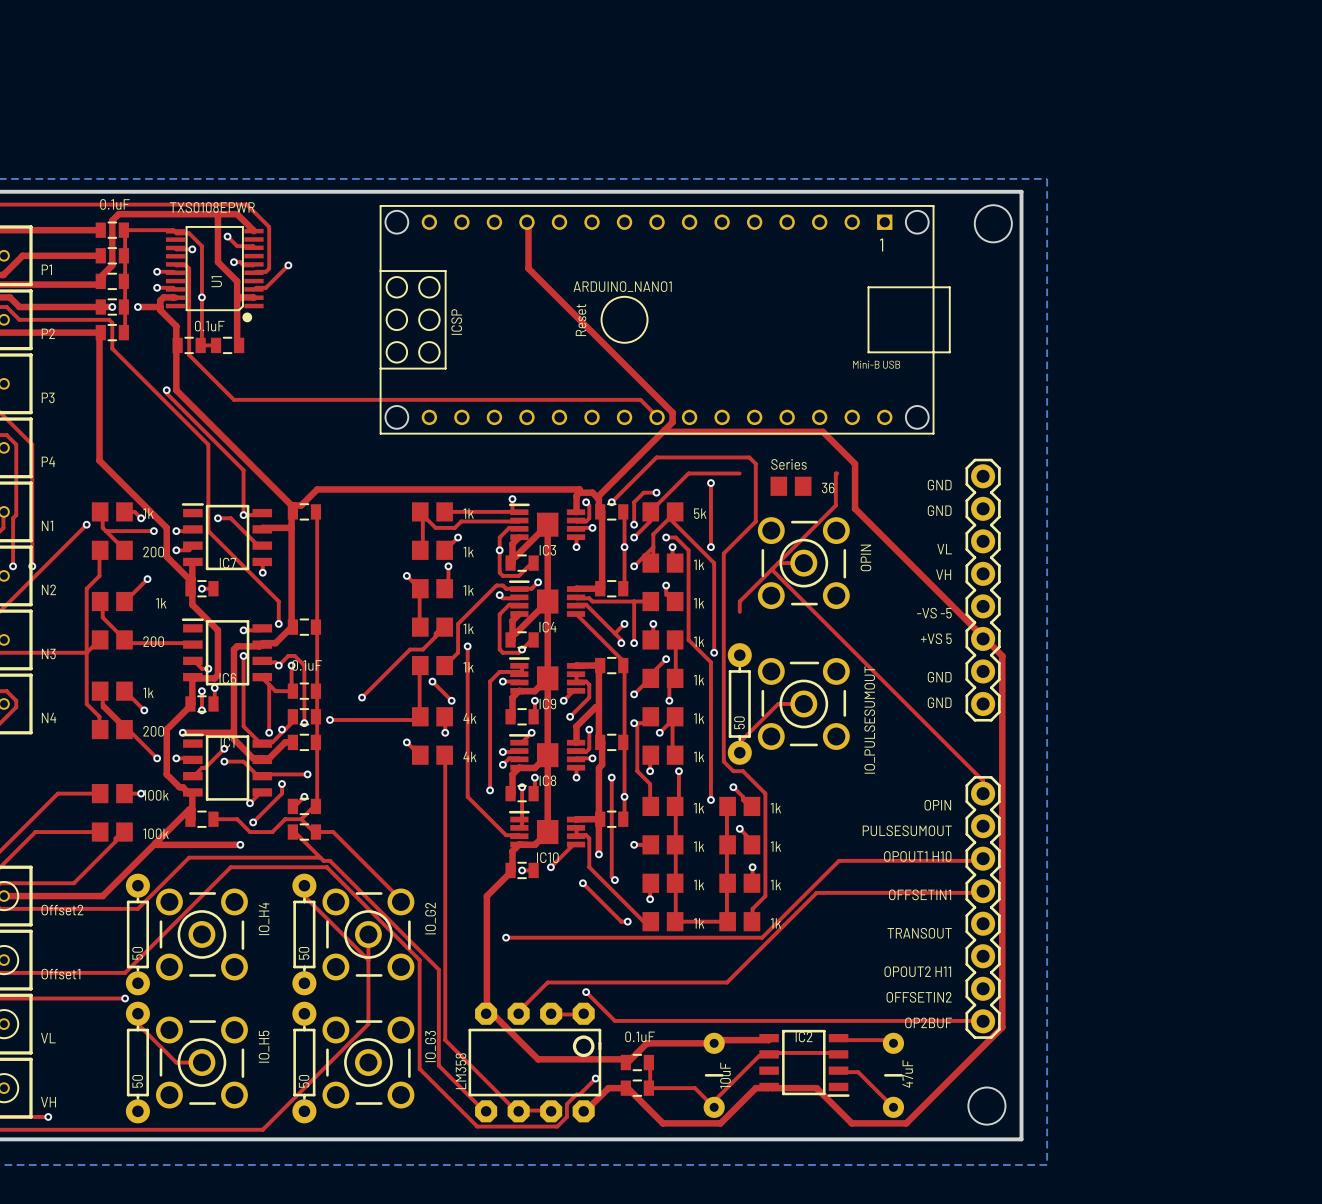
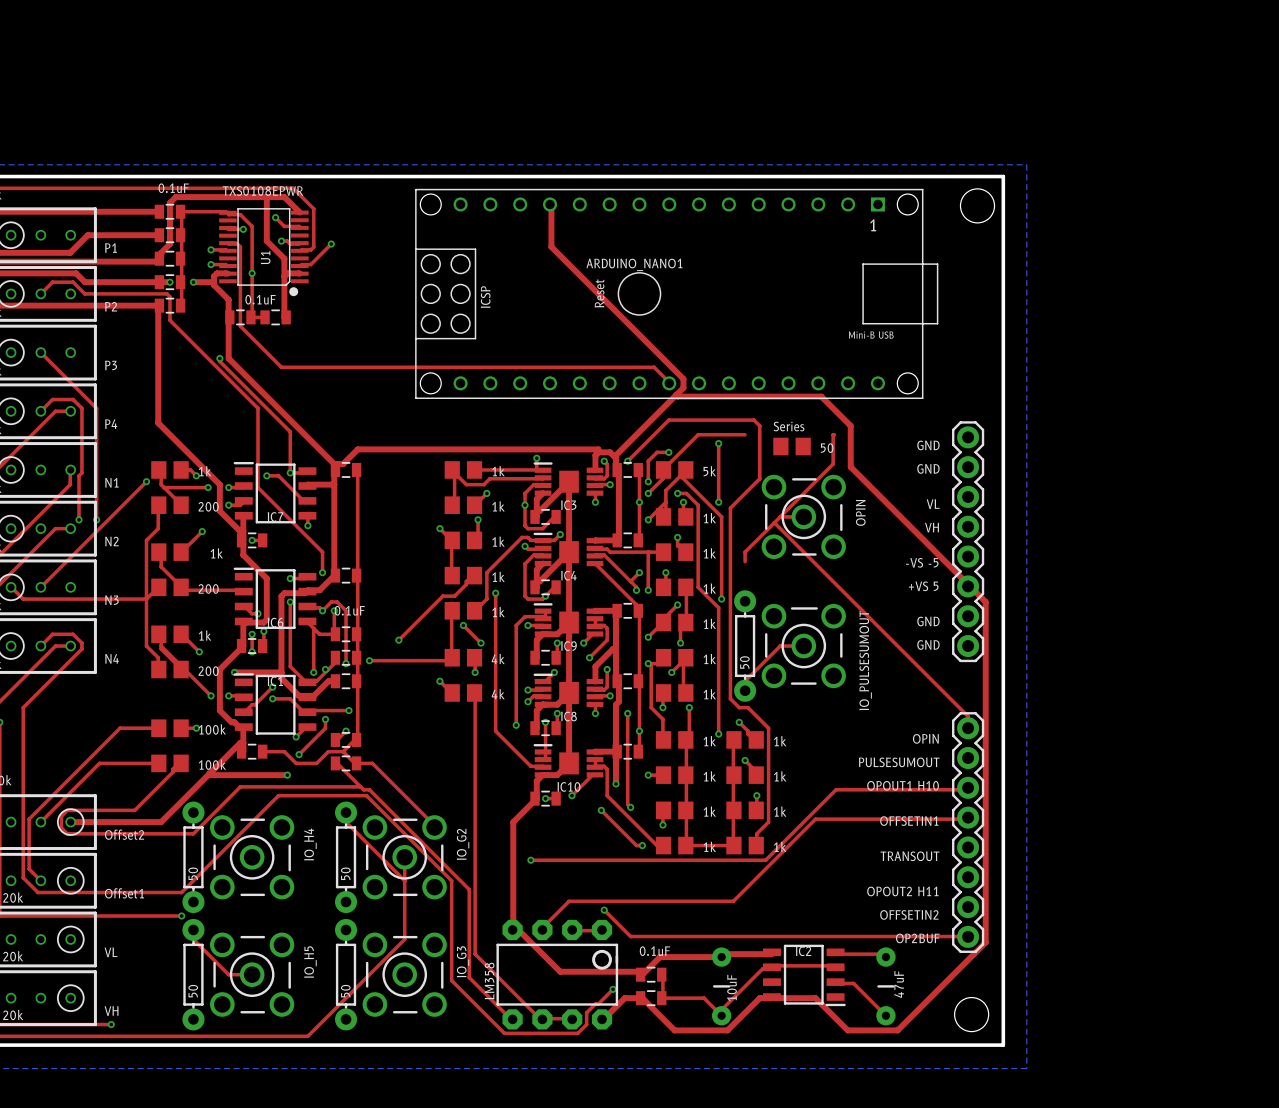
part value: 36 (828, 487) -> 50 (827, 448)

